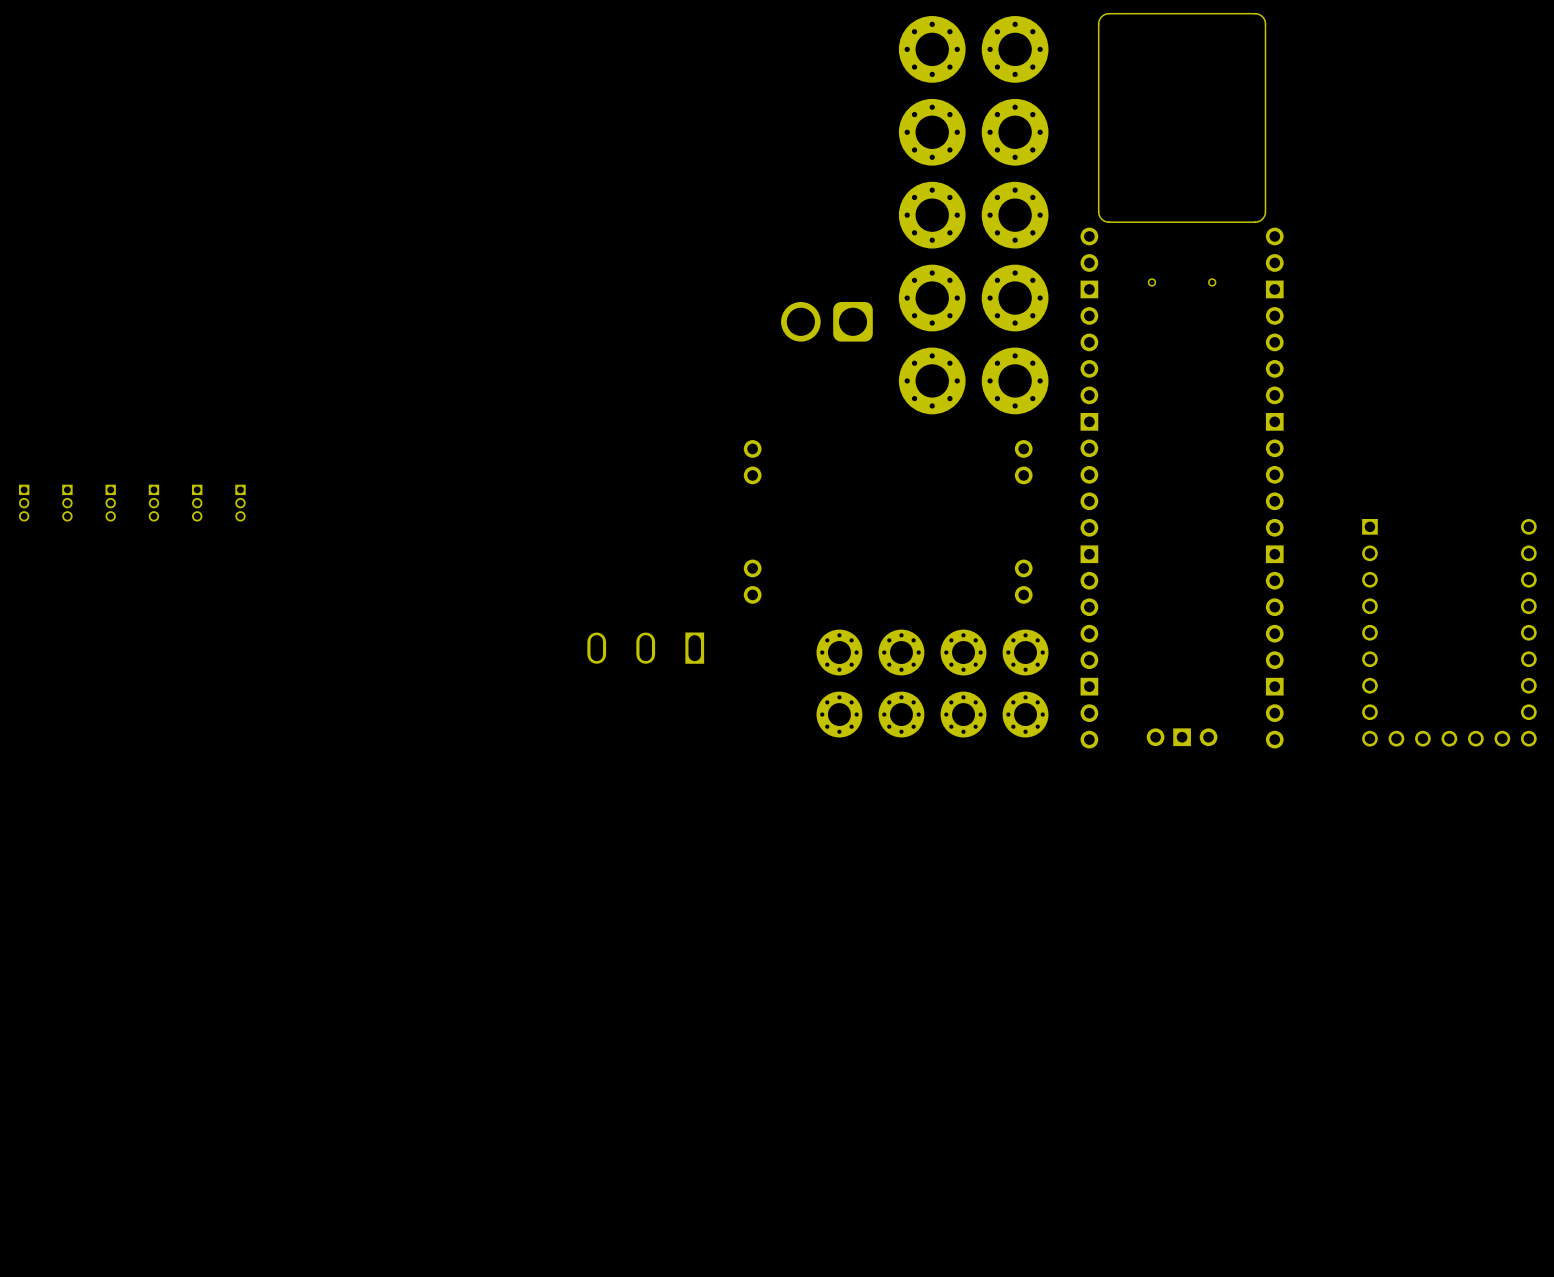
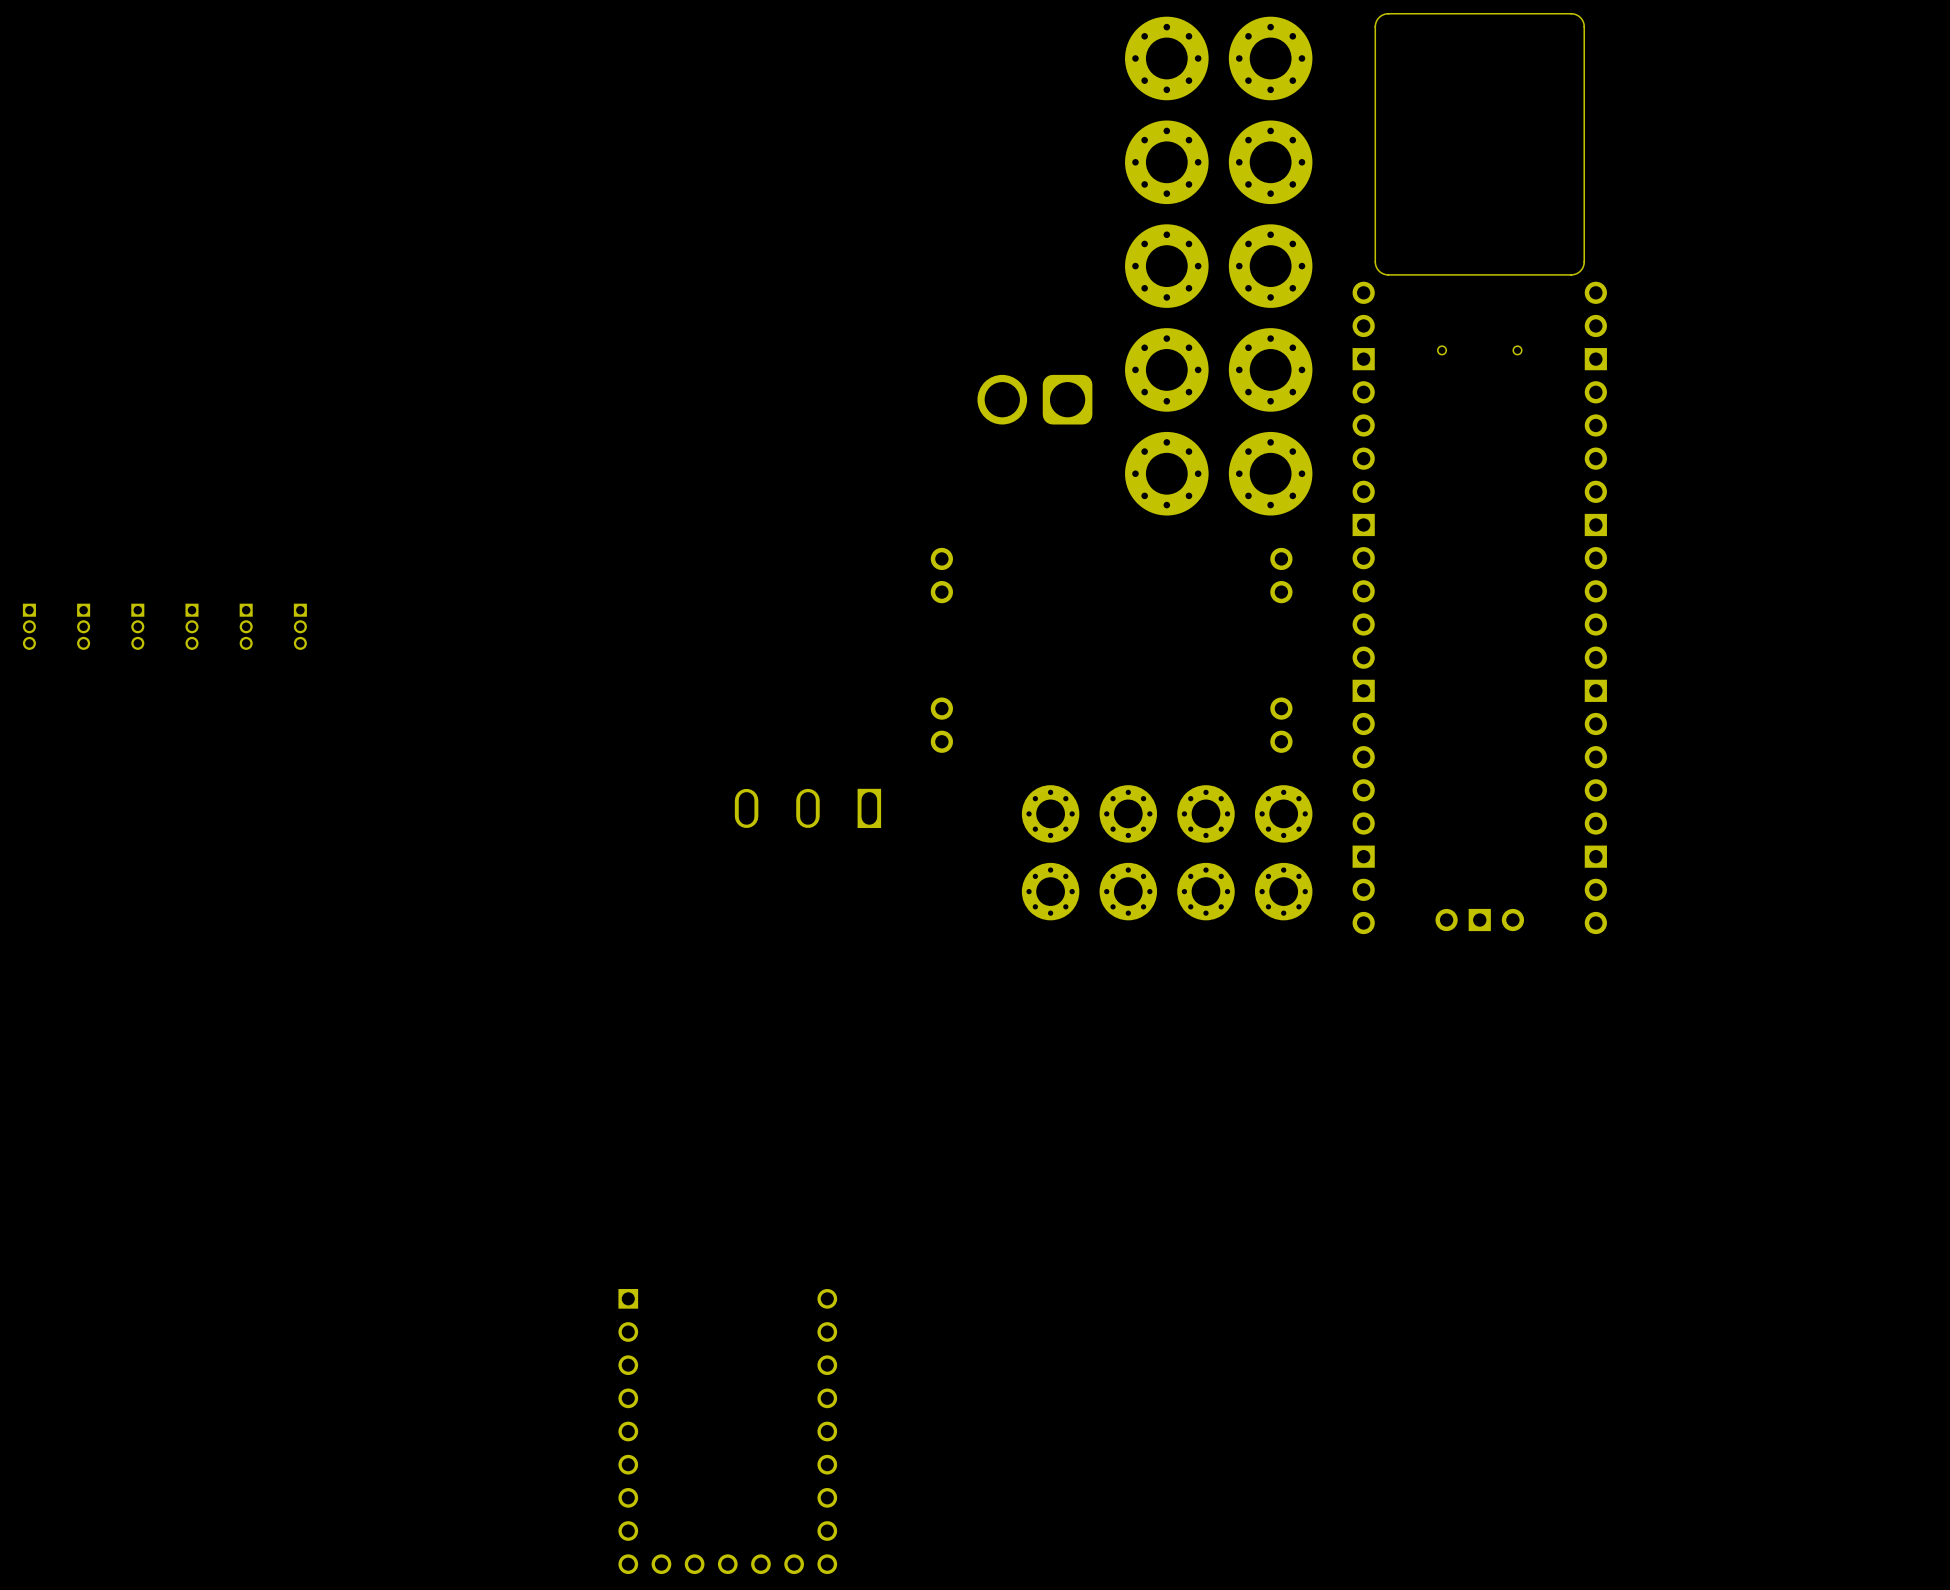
part: (1449, 632) -> none
part: none -> (727, 1431)

